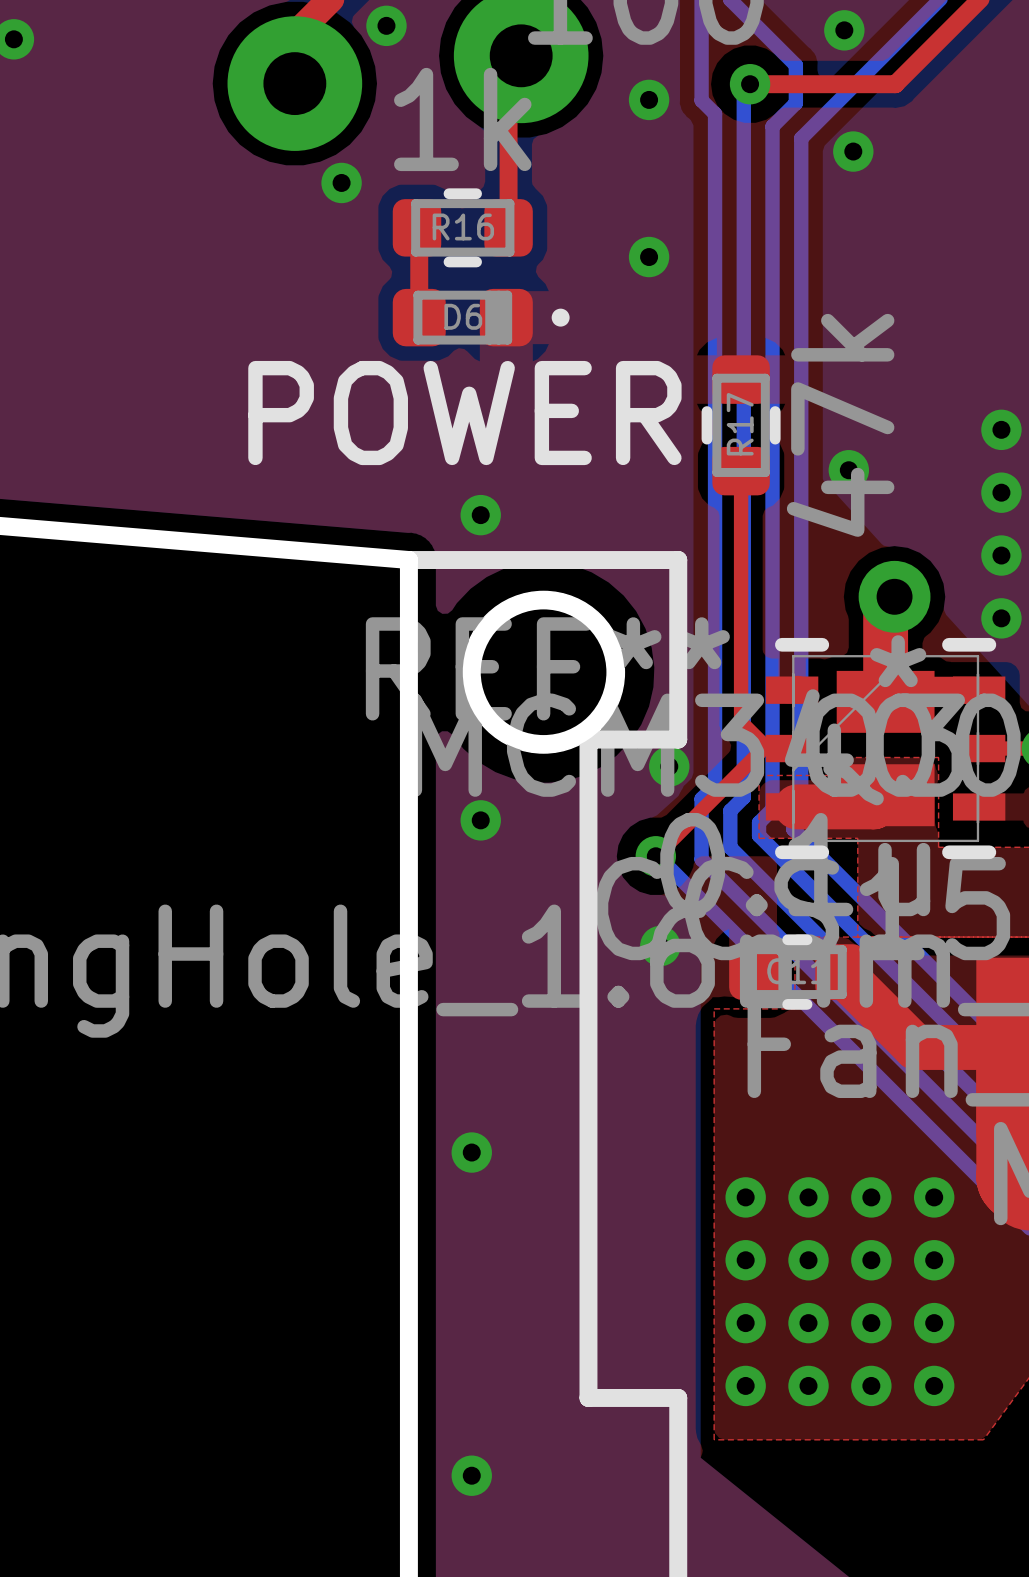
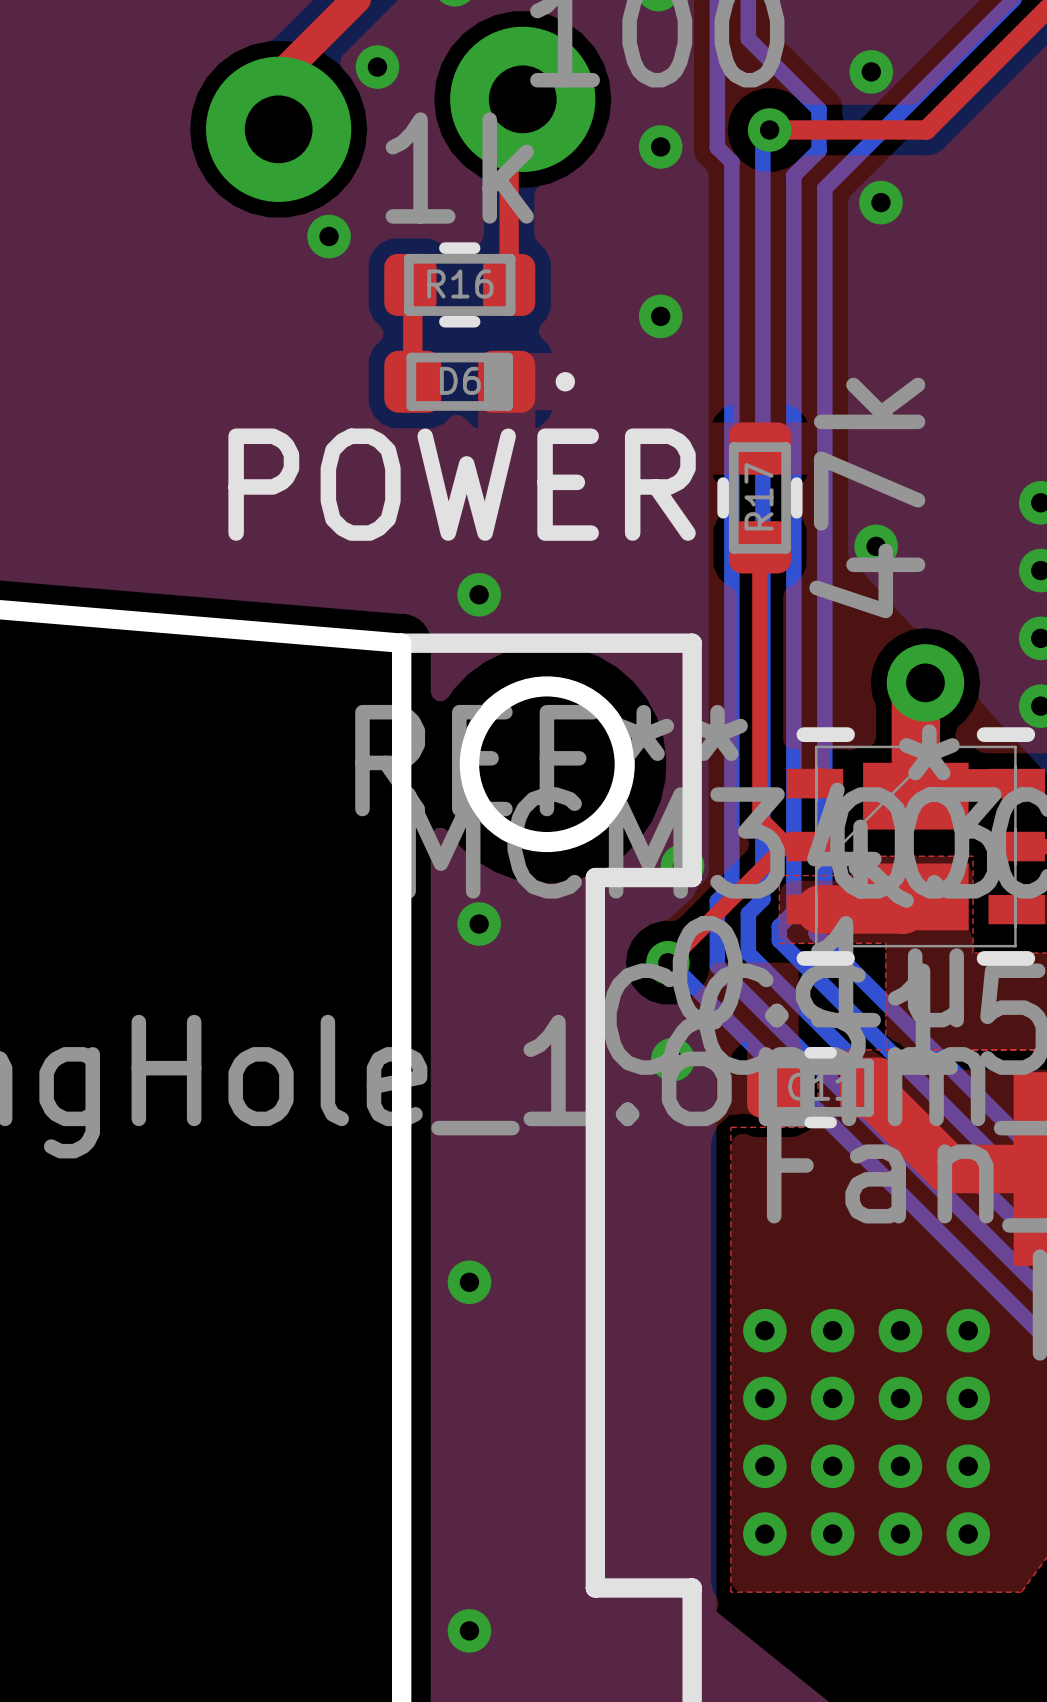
line: (678, 739) (588, 739) (588, 777) -> (692, 836) (692, 877) (595, 877)
line: (588, 1397) (678, 1397) (678, 1435) -> (595, 1547) (595, 1587) (692, 1587)

